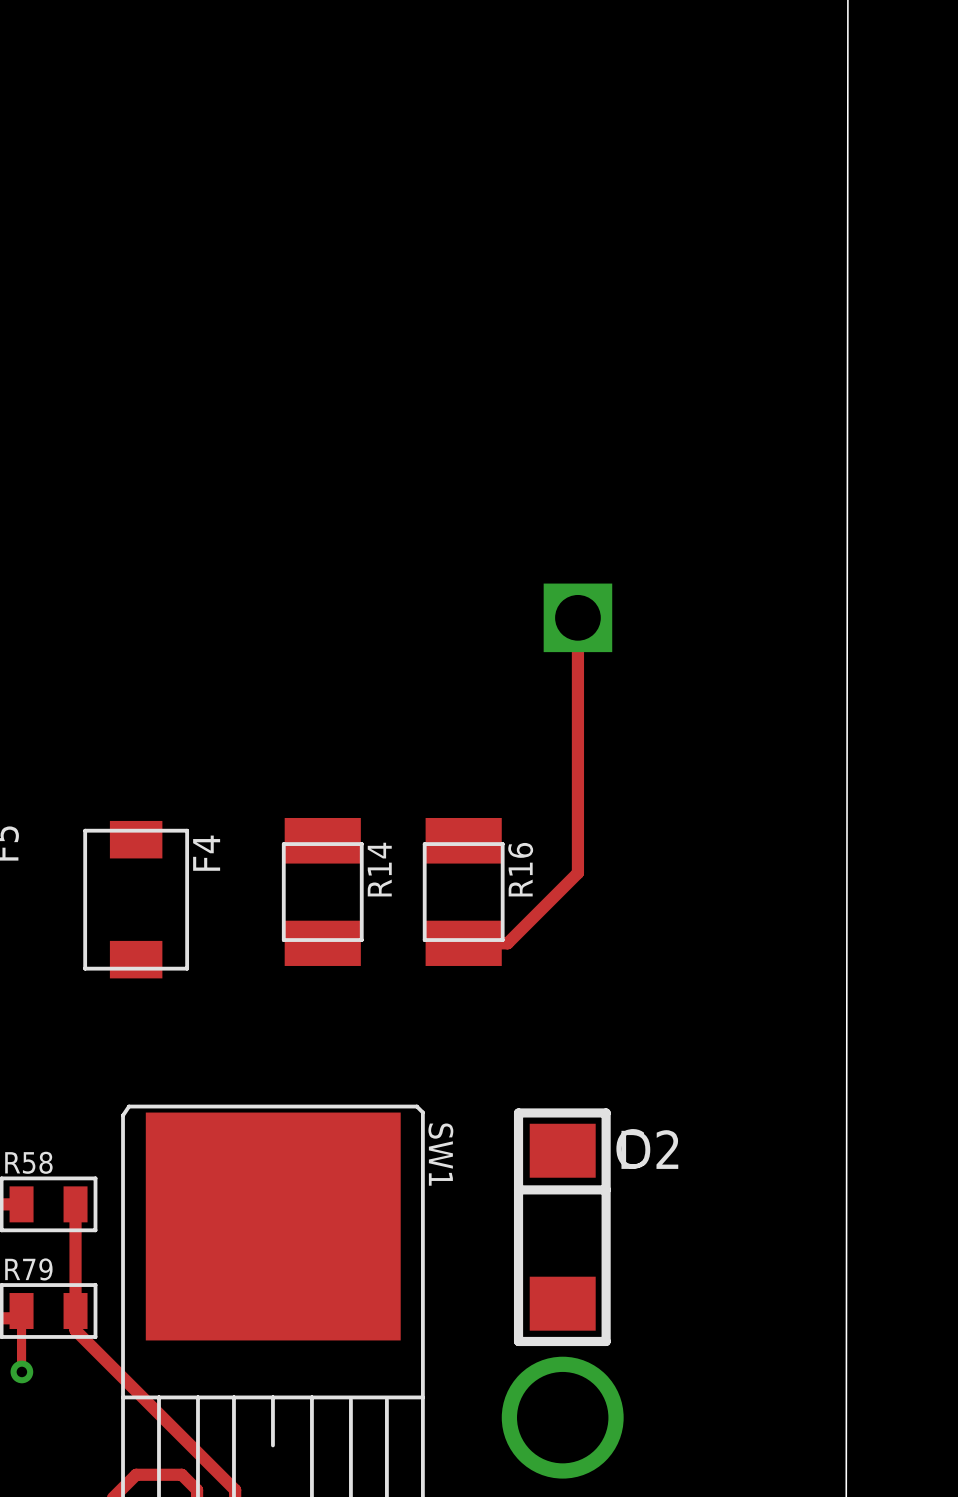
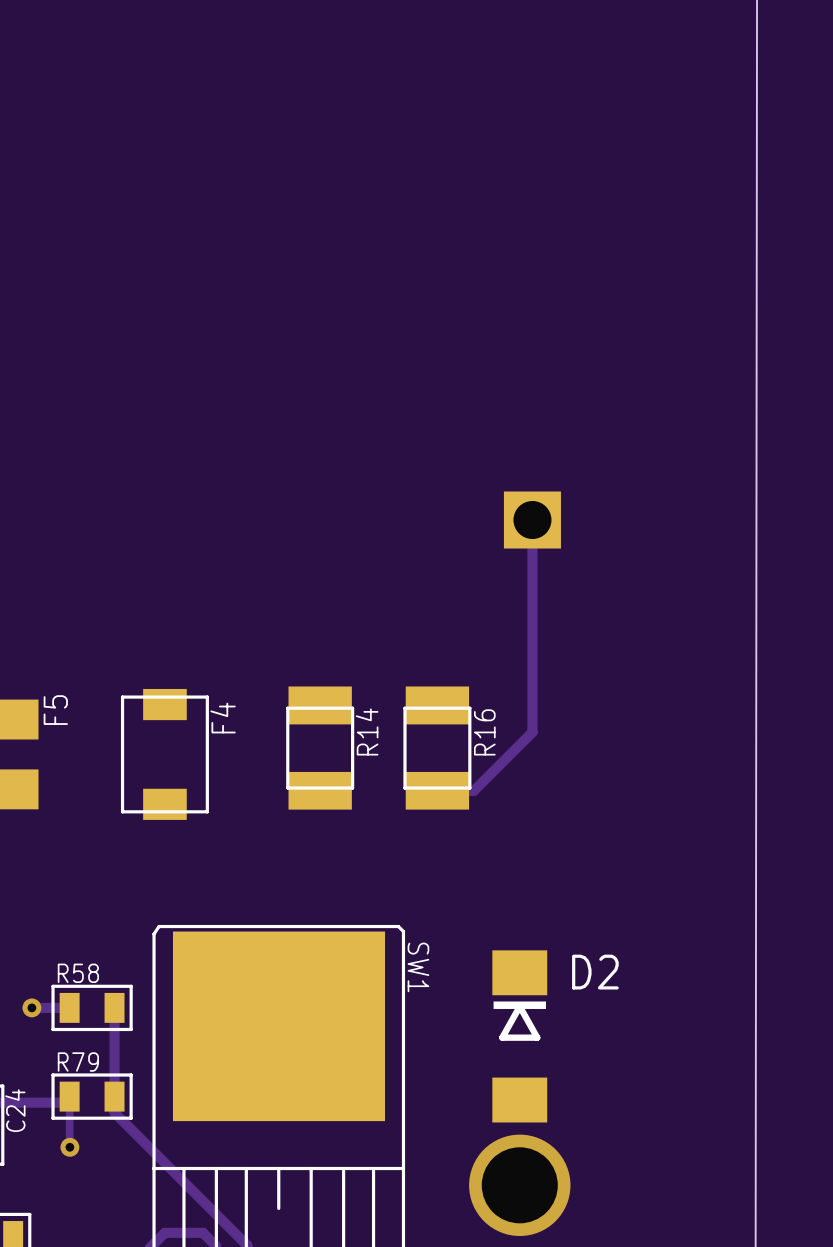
D2 footprint: [513, 1108, 611, 1347] -> [492, 950, 548, 1123]

